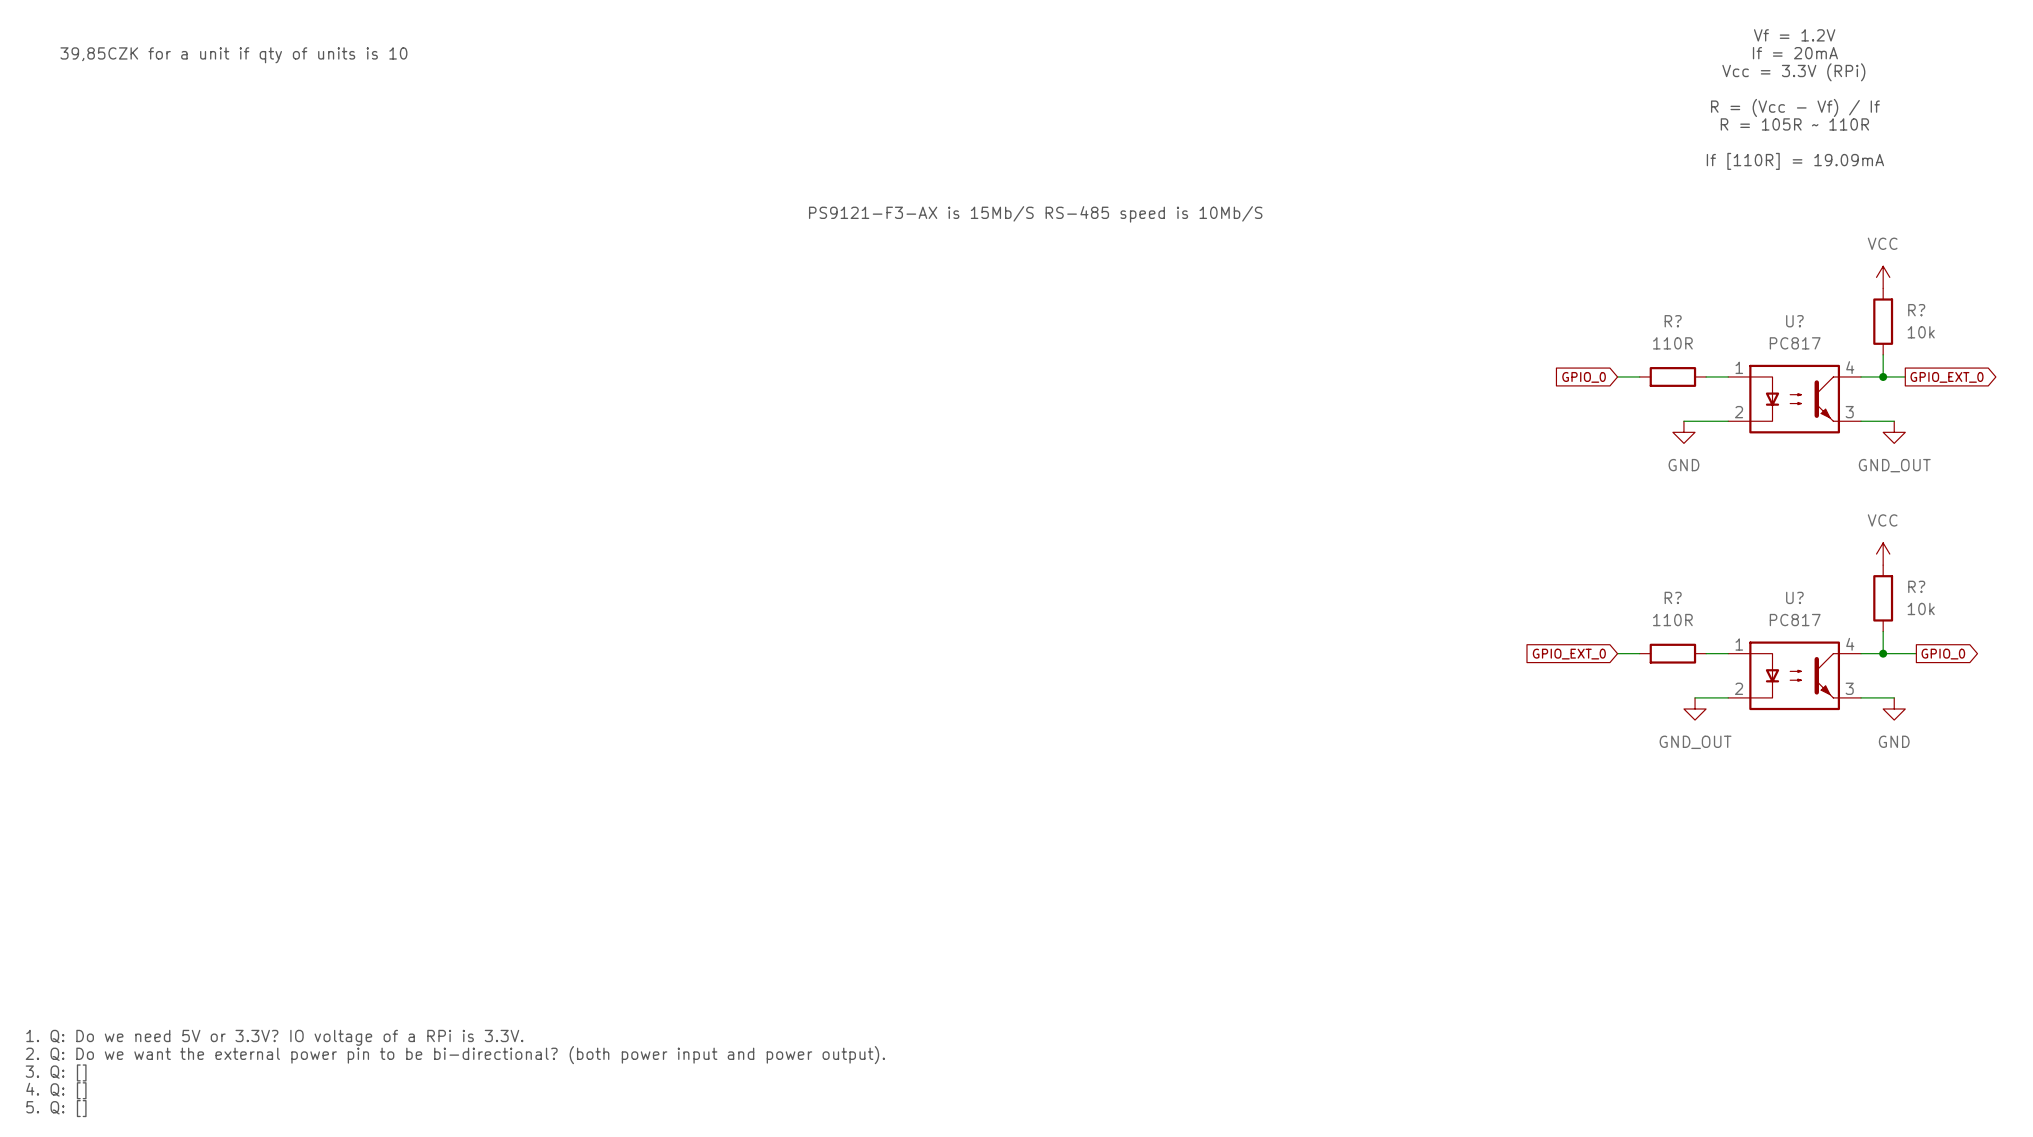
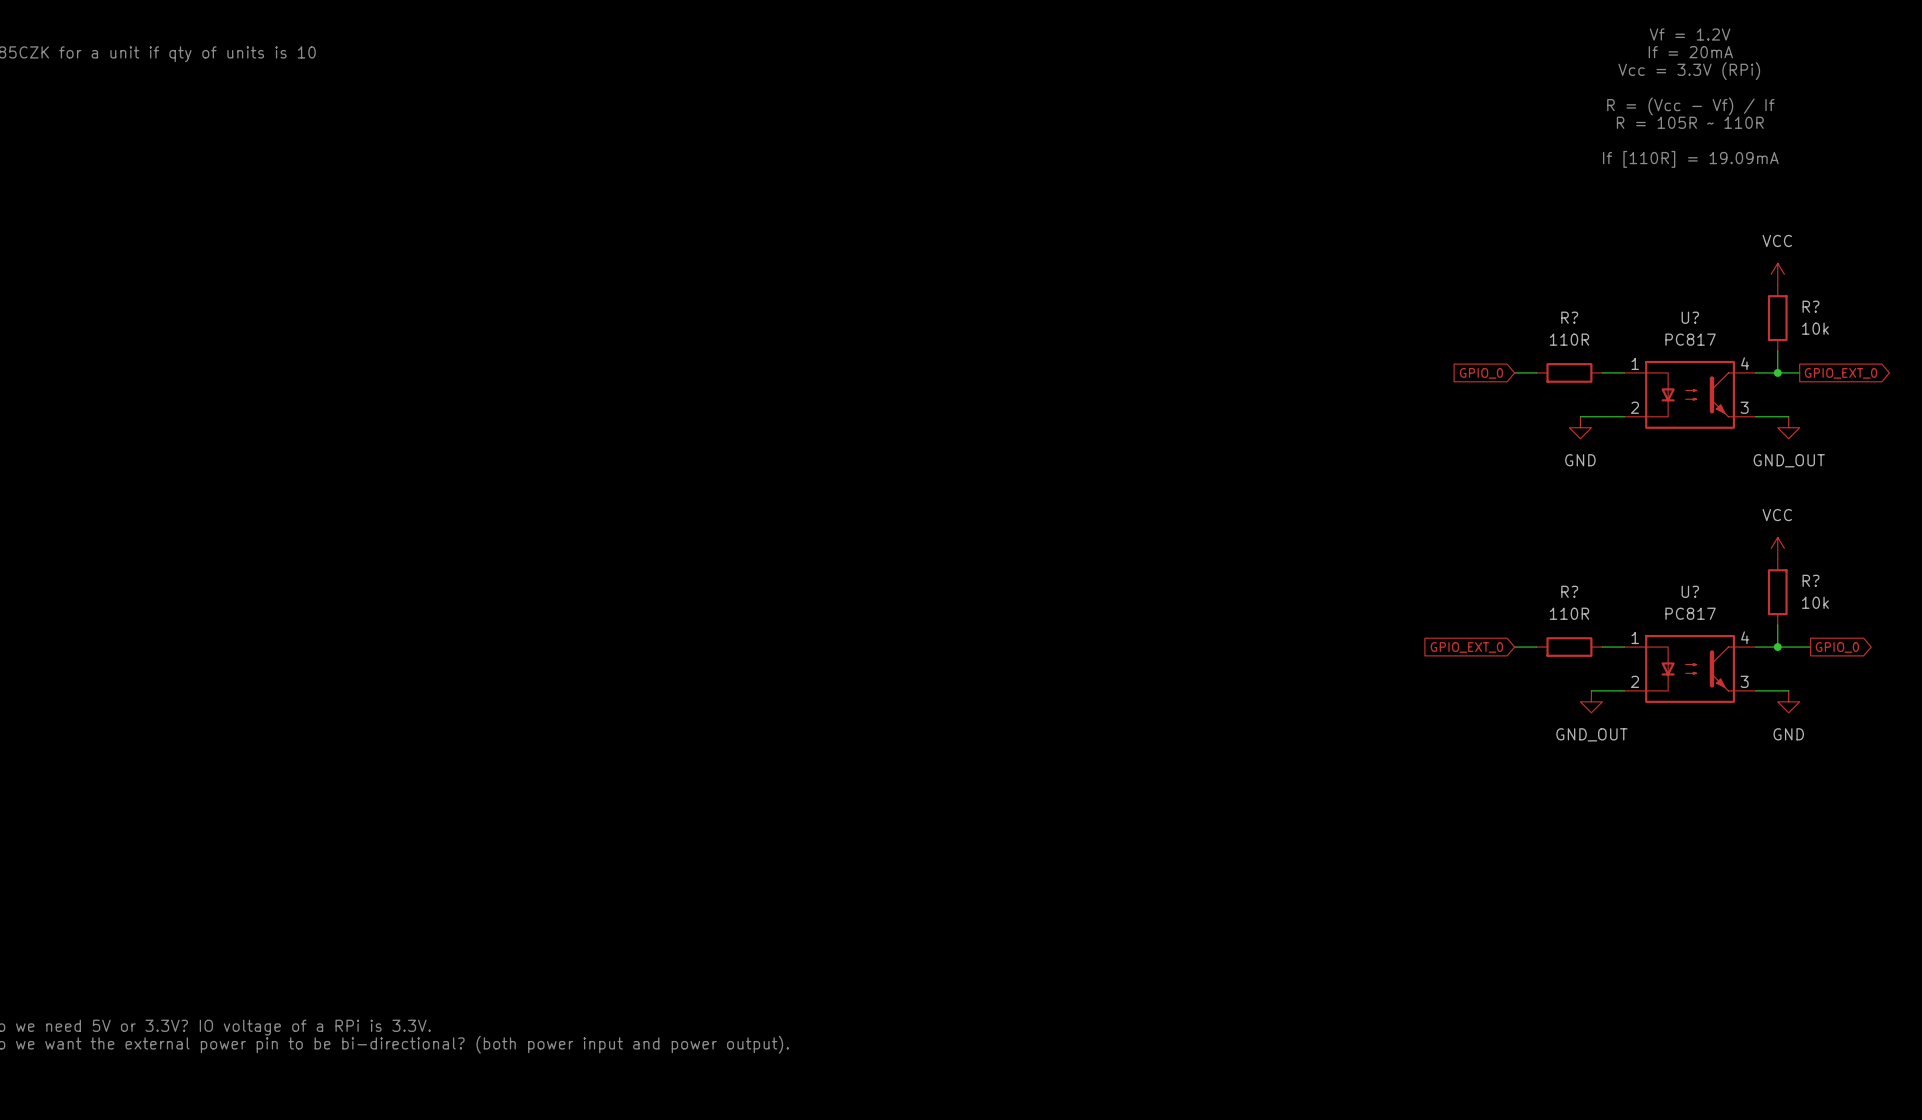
text: PS9121-F3-AX is 15Mb/S RS-485 speed is 10Mb/S (1035, 214) -> none

